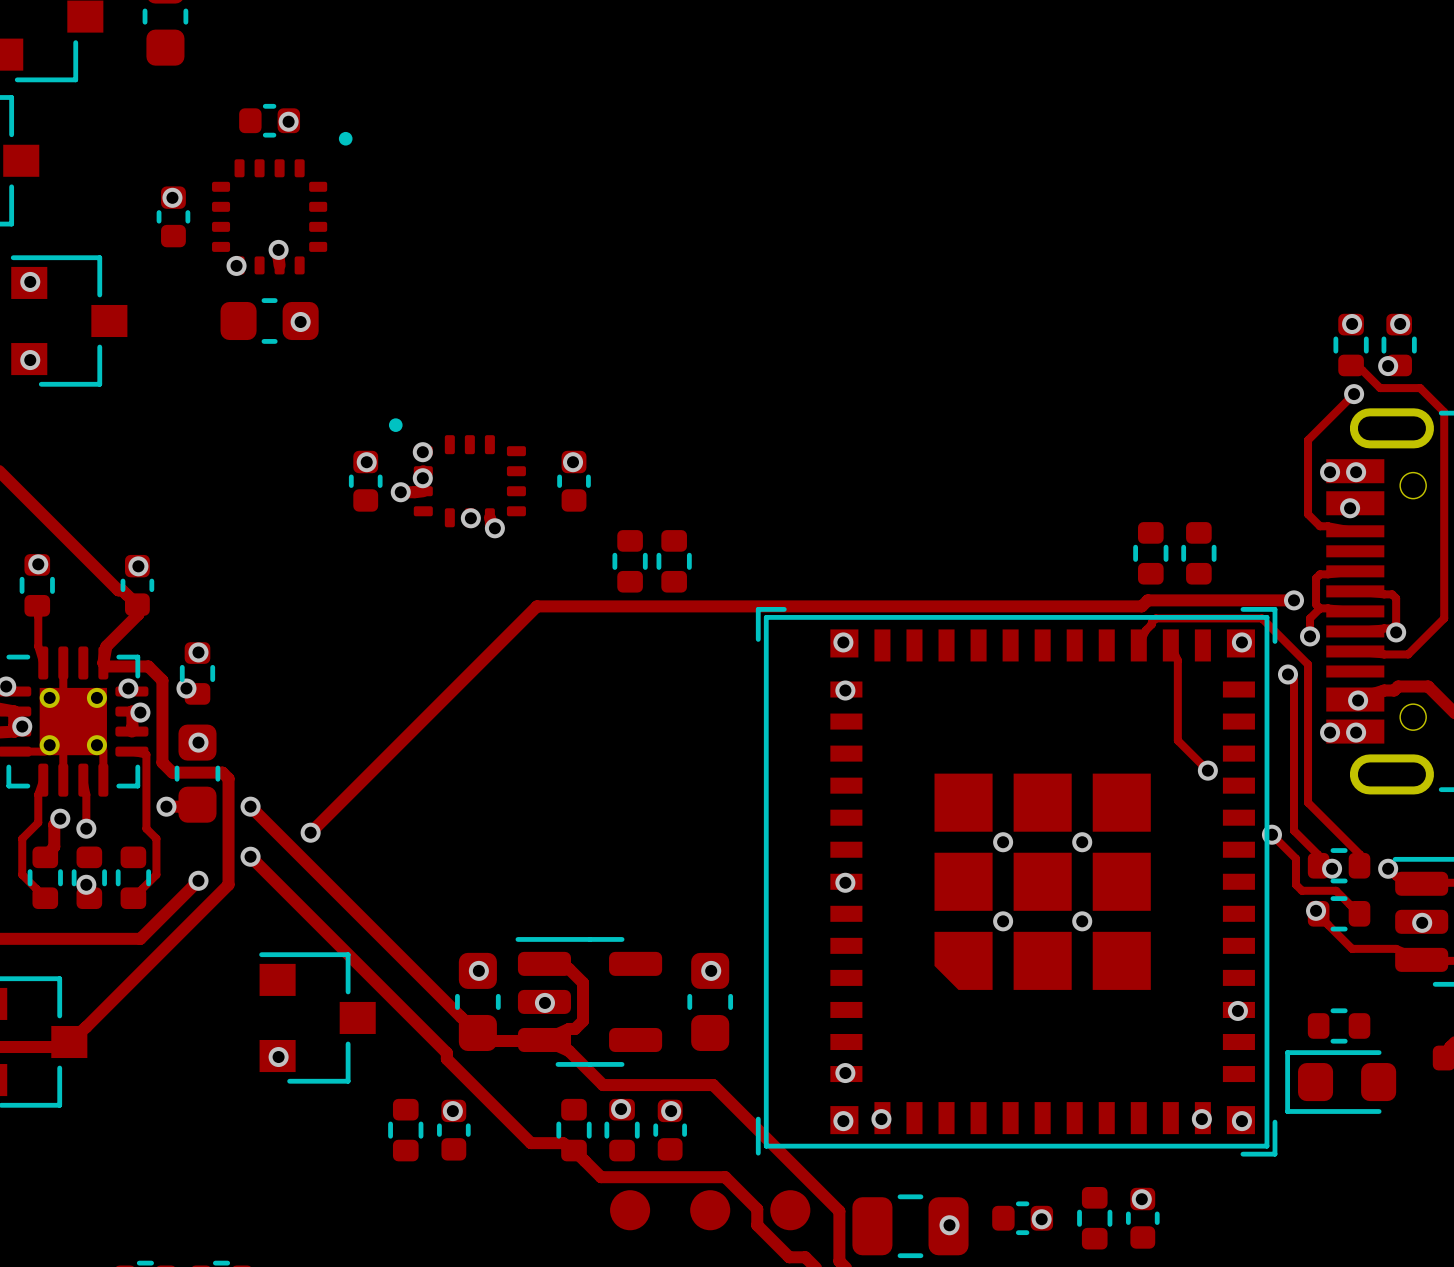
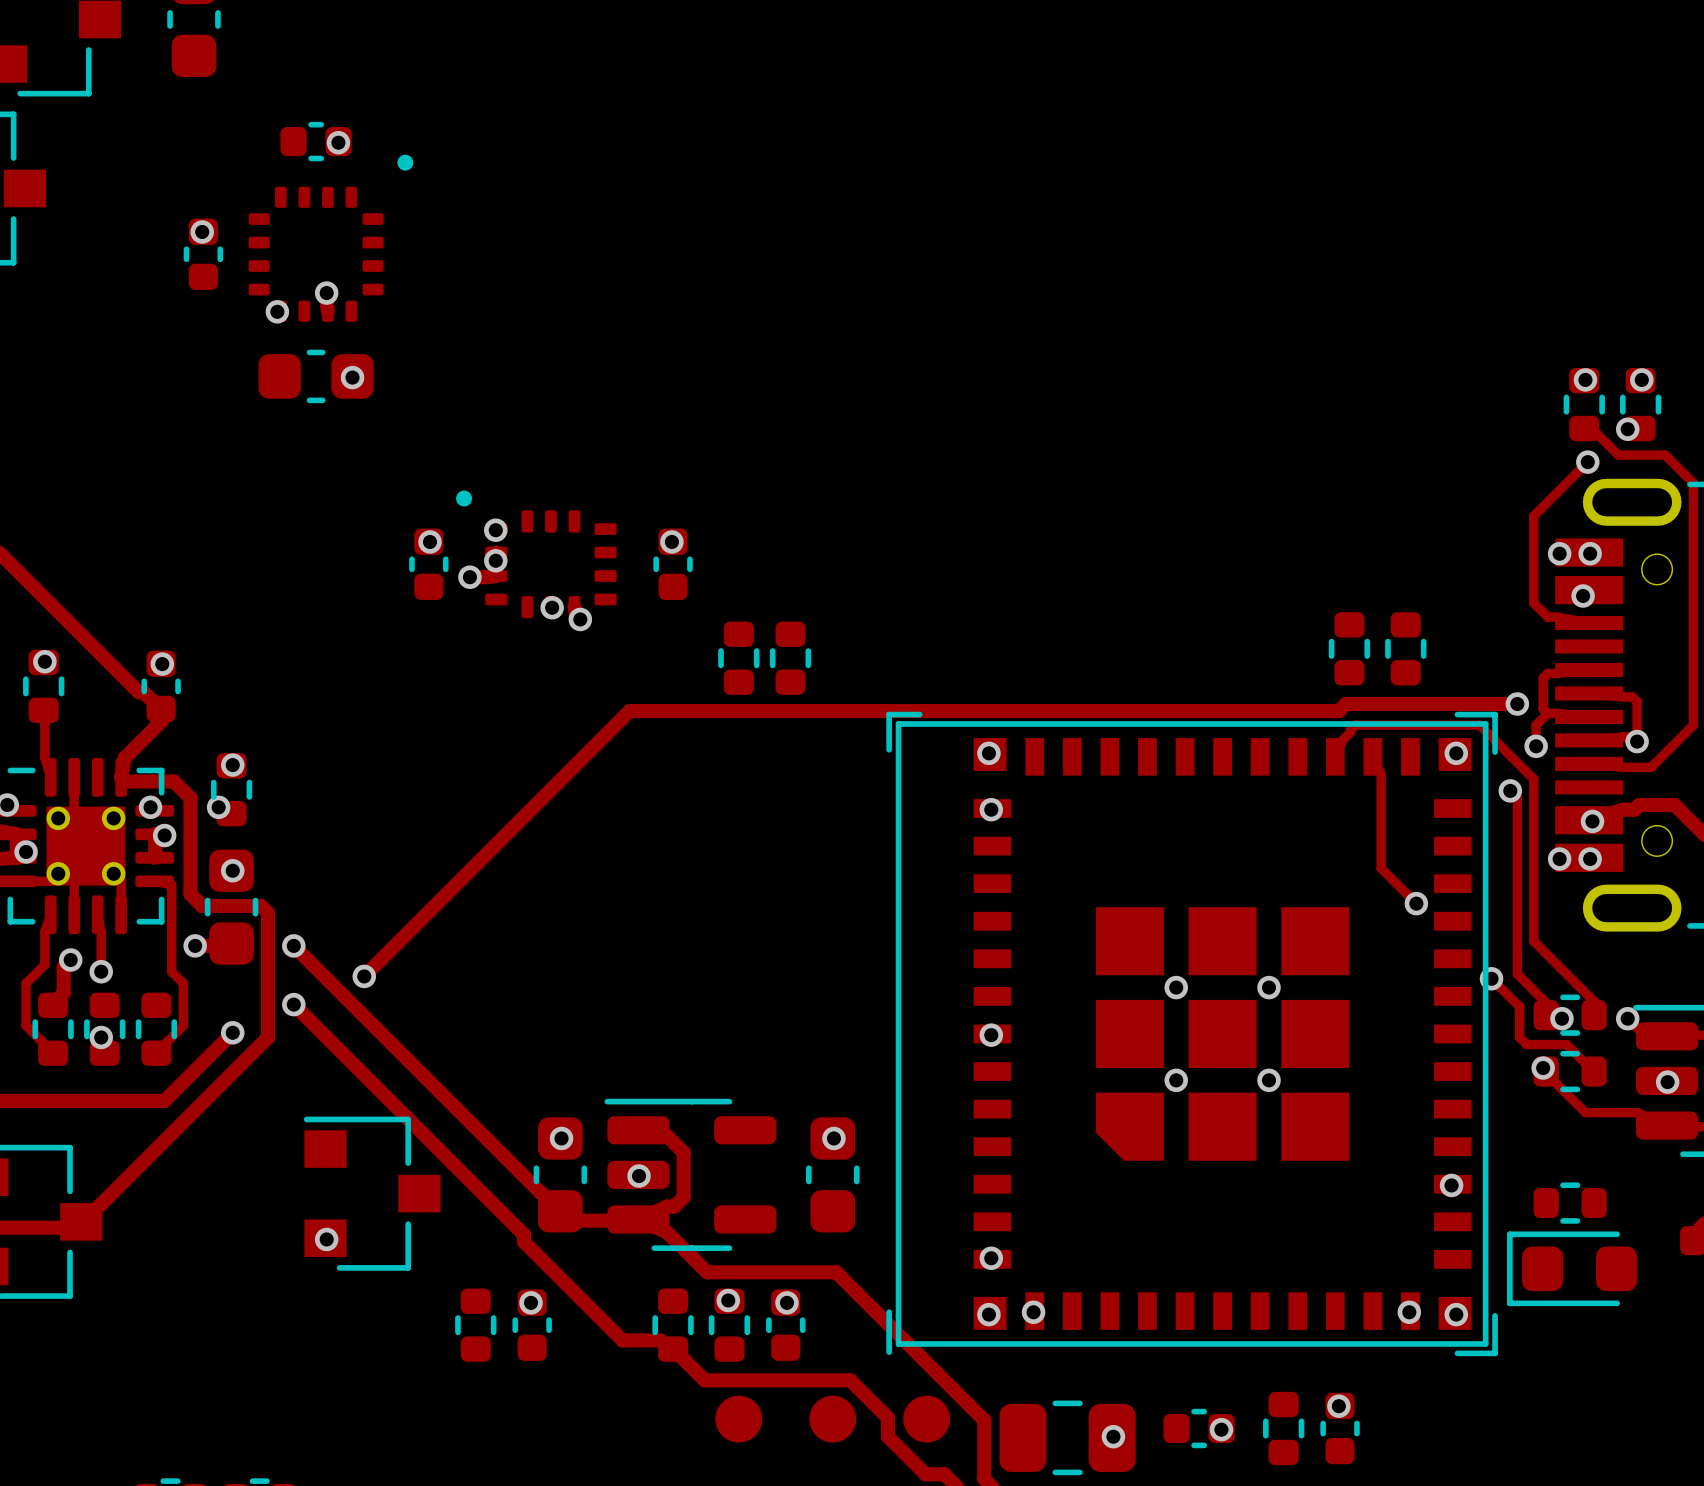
via: (30, 281) -> none
part: (69, 321) -> none
via: (30, 360) -> none

